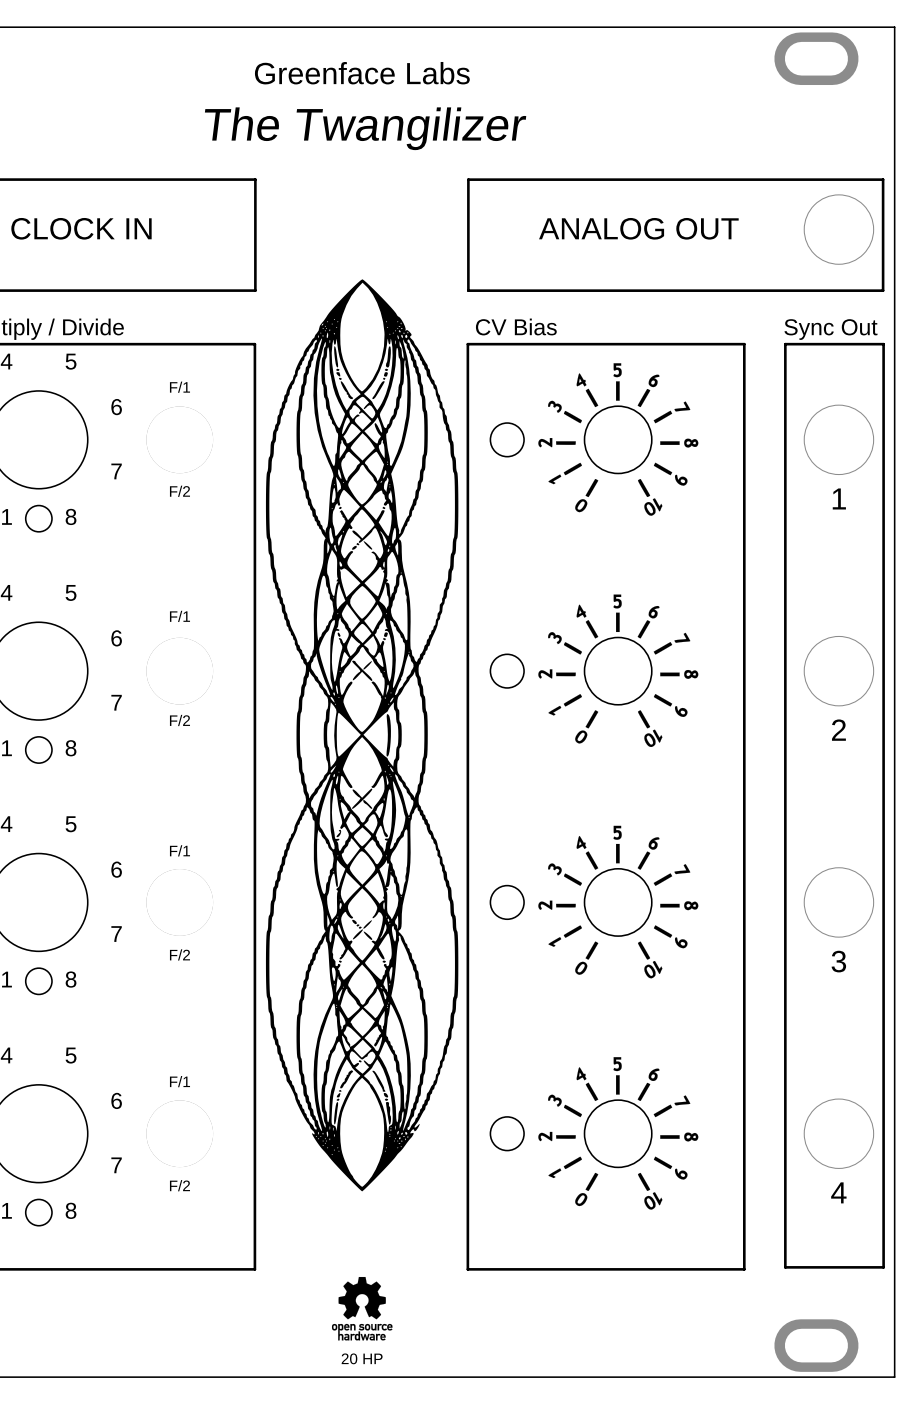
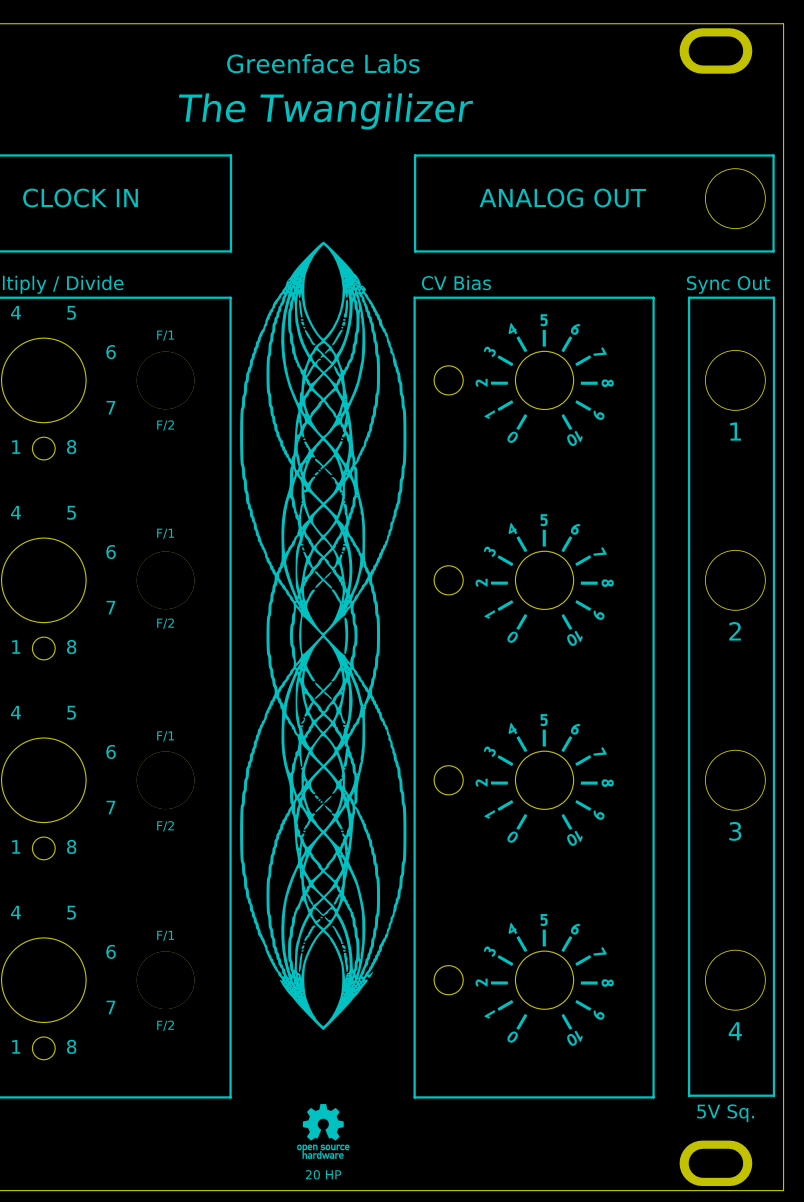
text: none -> 5V Sq. (725, 1113)

